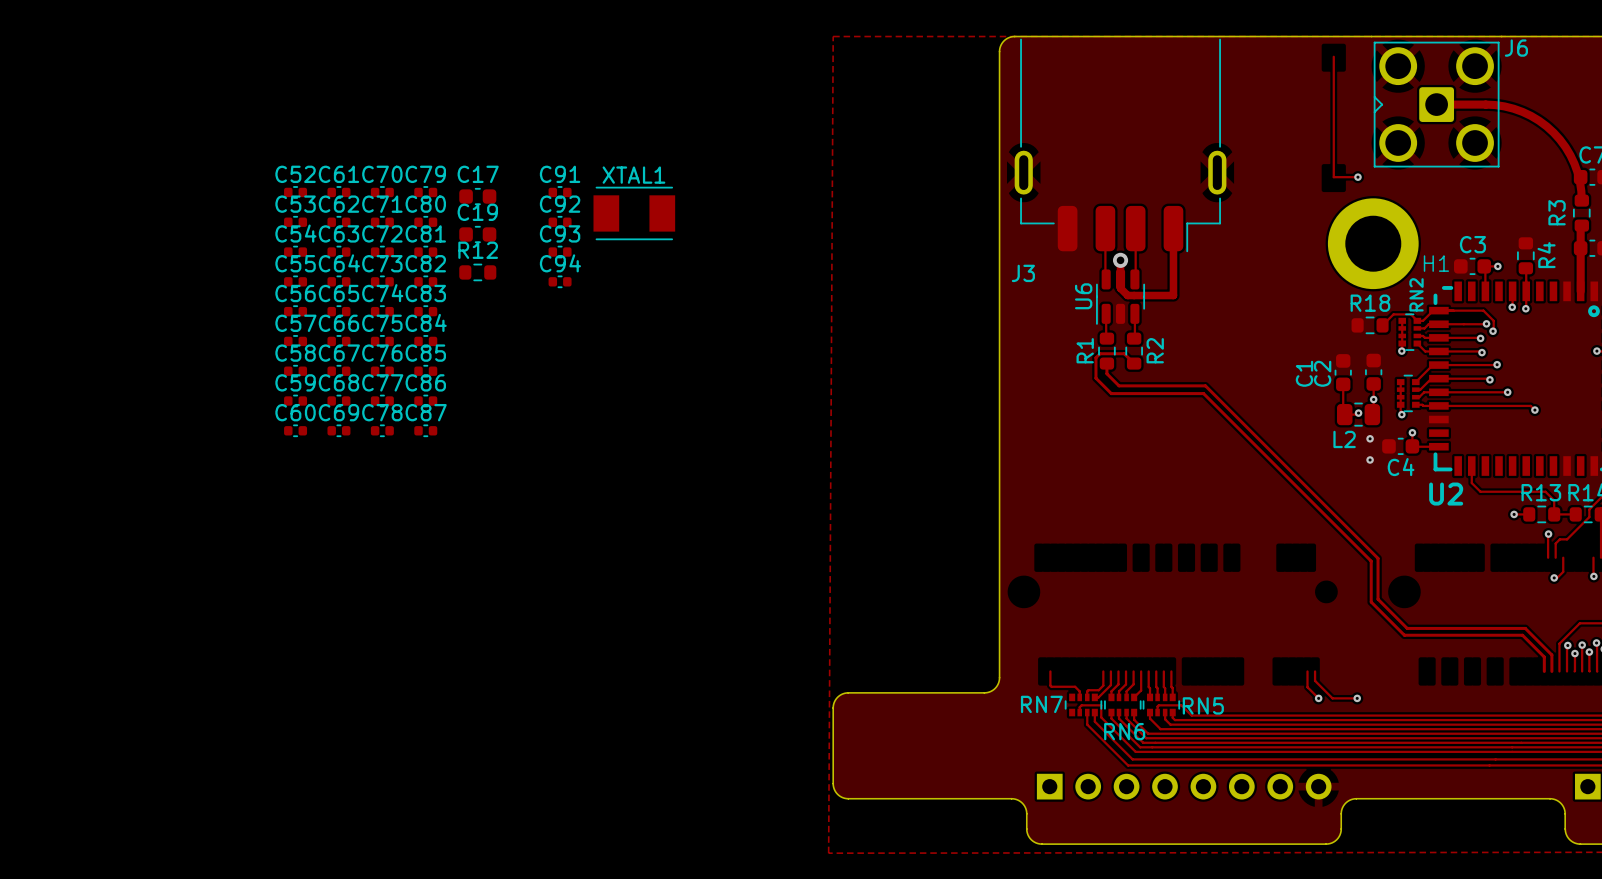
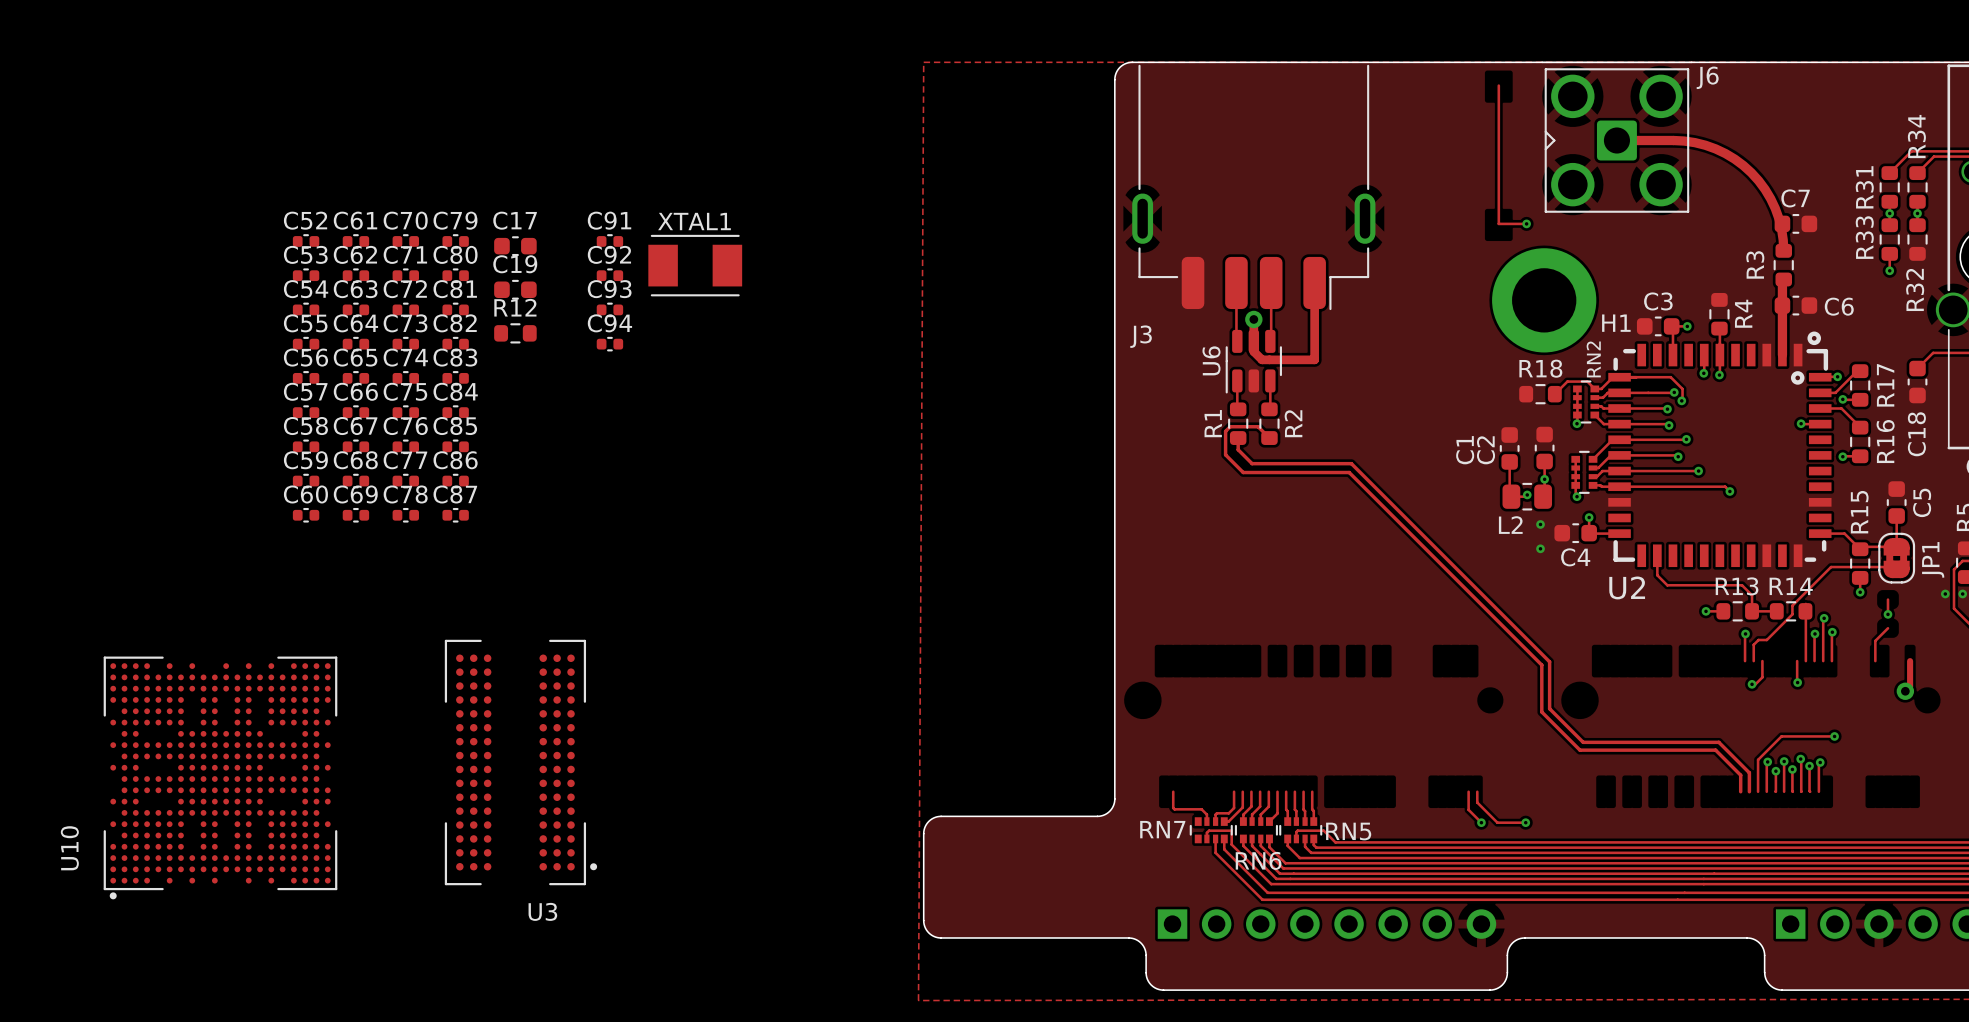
U3: none -> (520, 762)
U10: none -> (220, 777)

